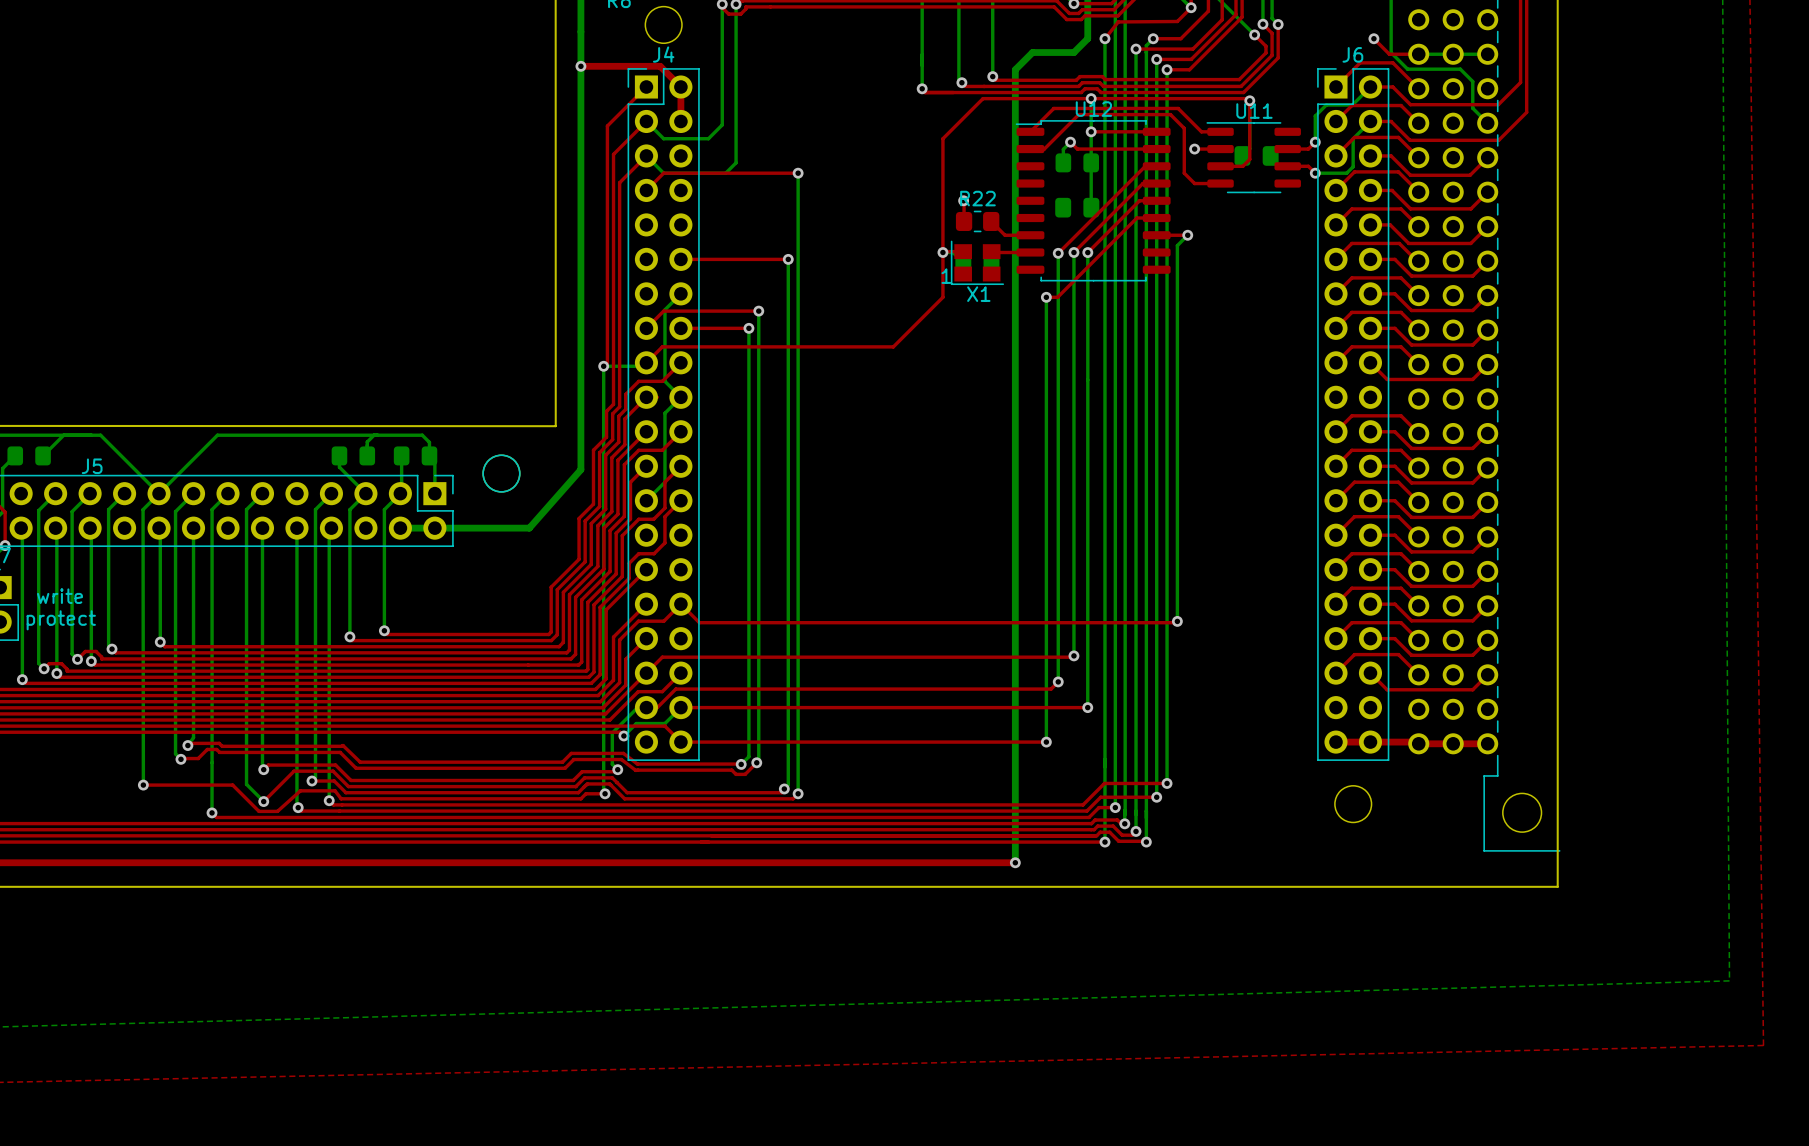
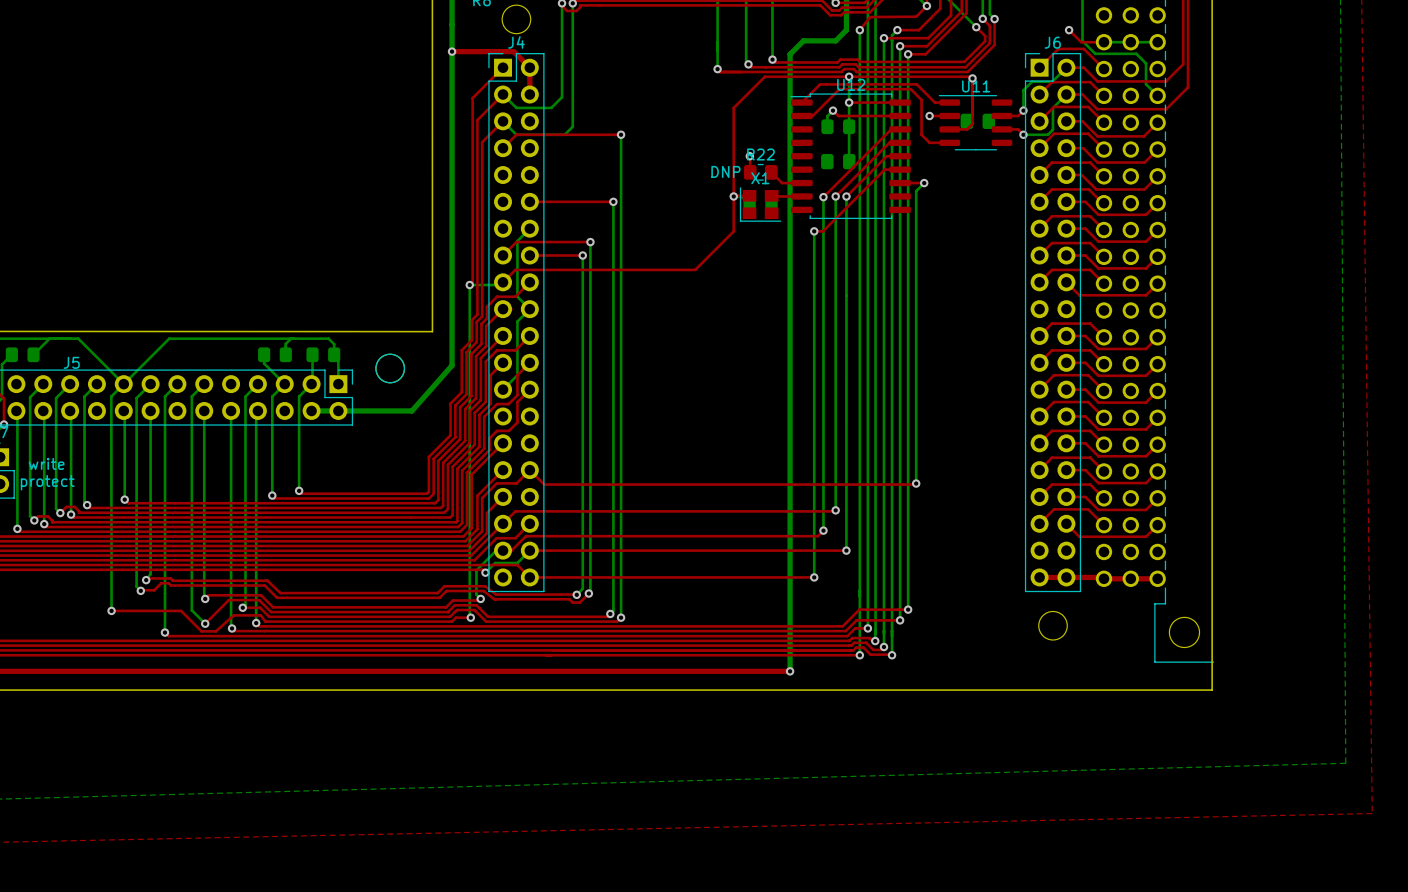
text: none -> DNP (725, 171)
text: 1 (946, 276) -> none
X1 name position: X1 (978, 294) -> X1 (760, 178)

